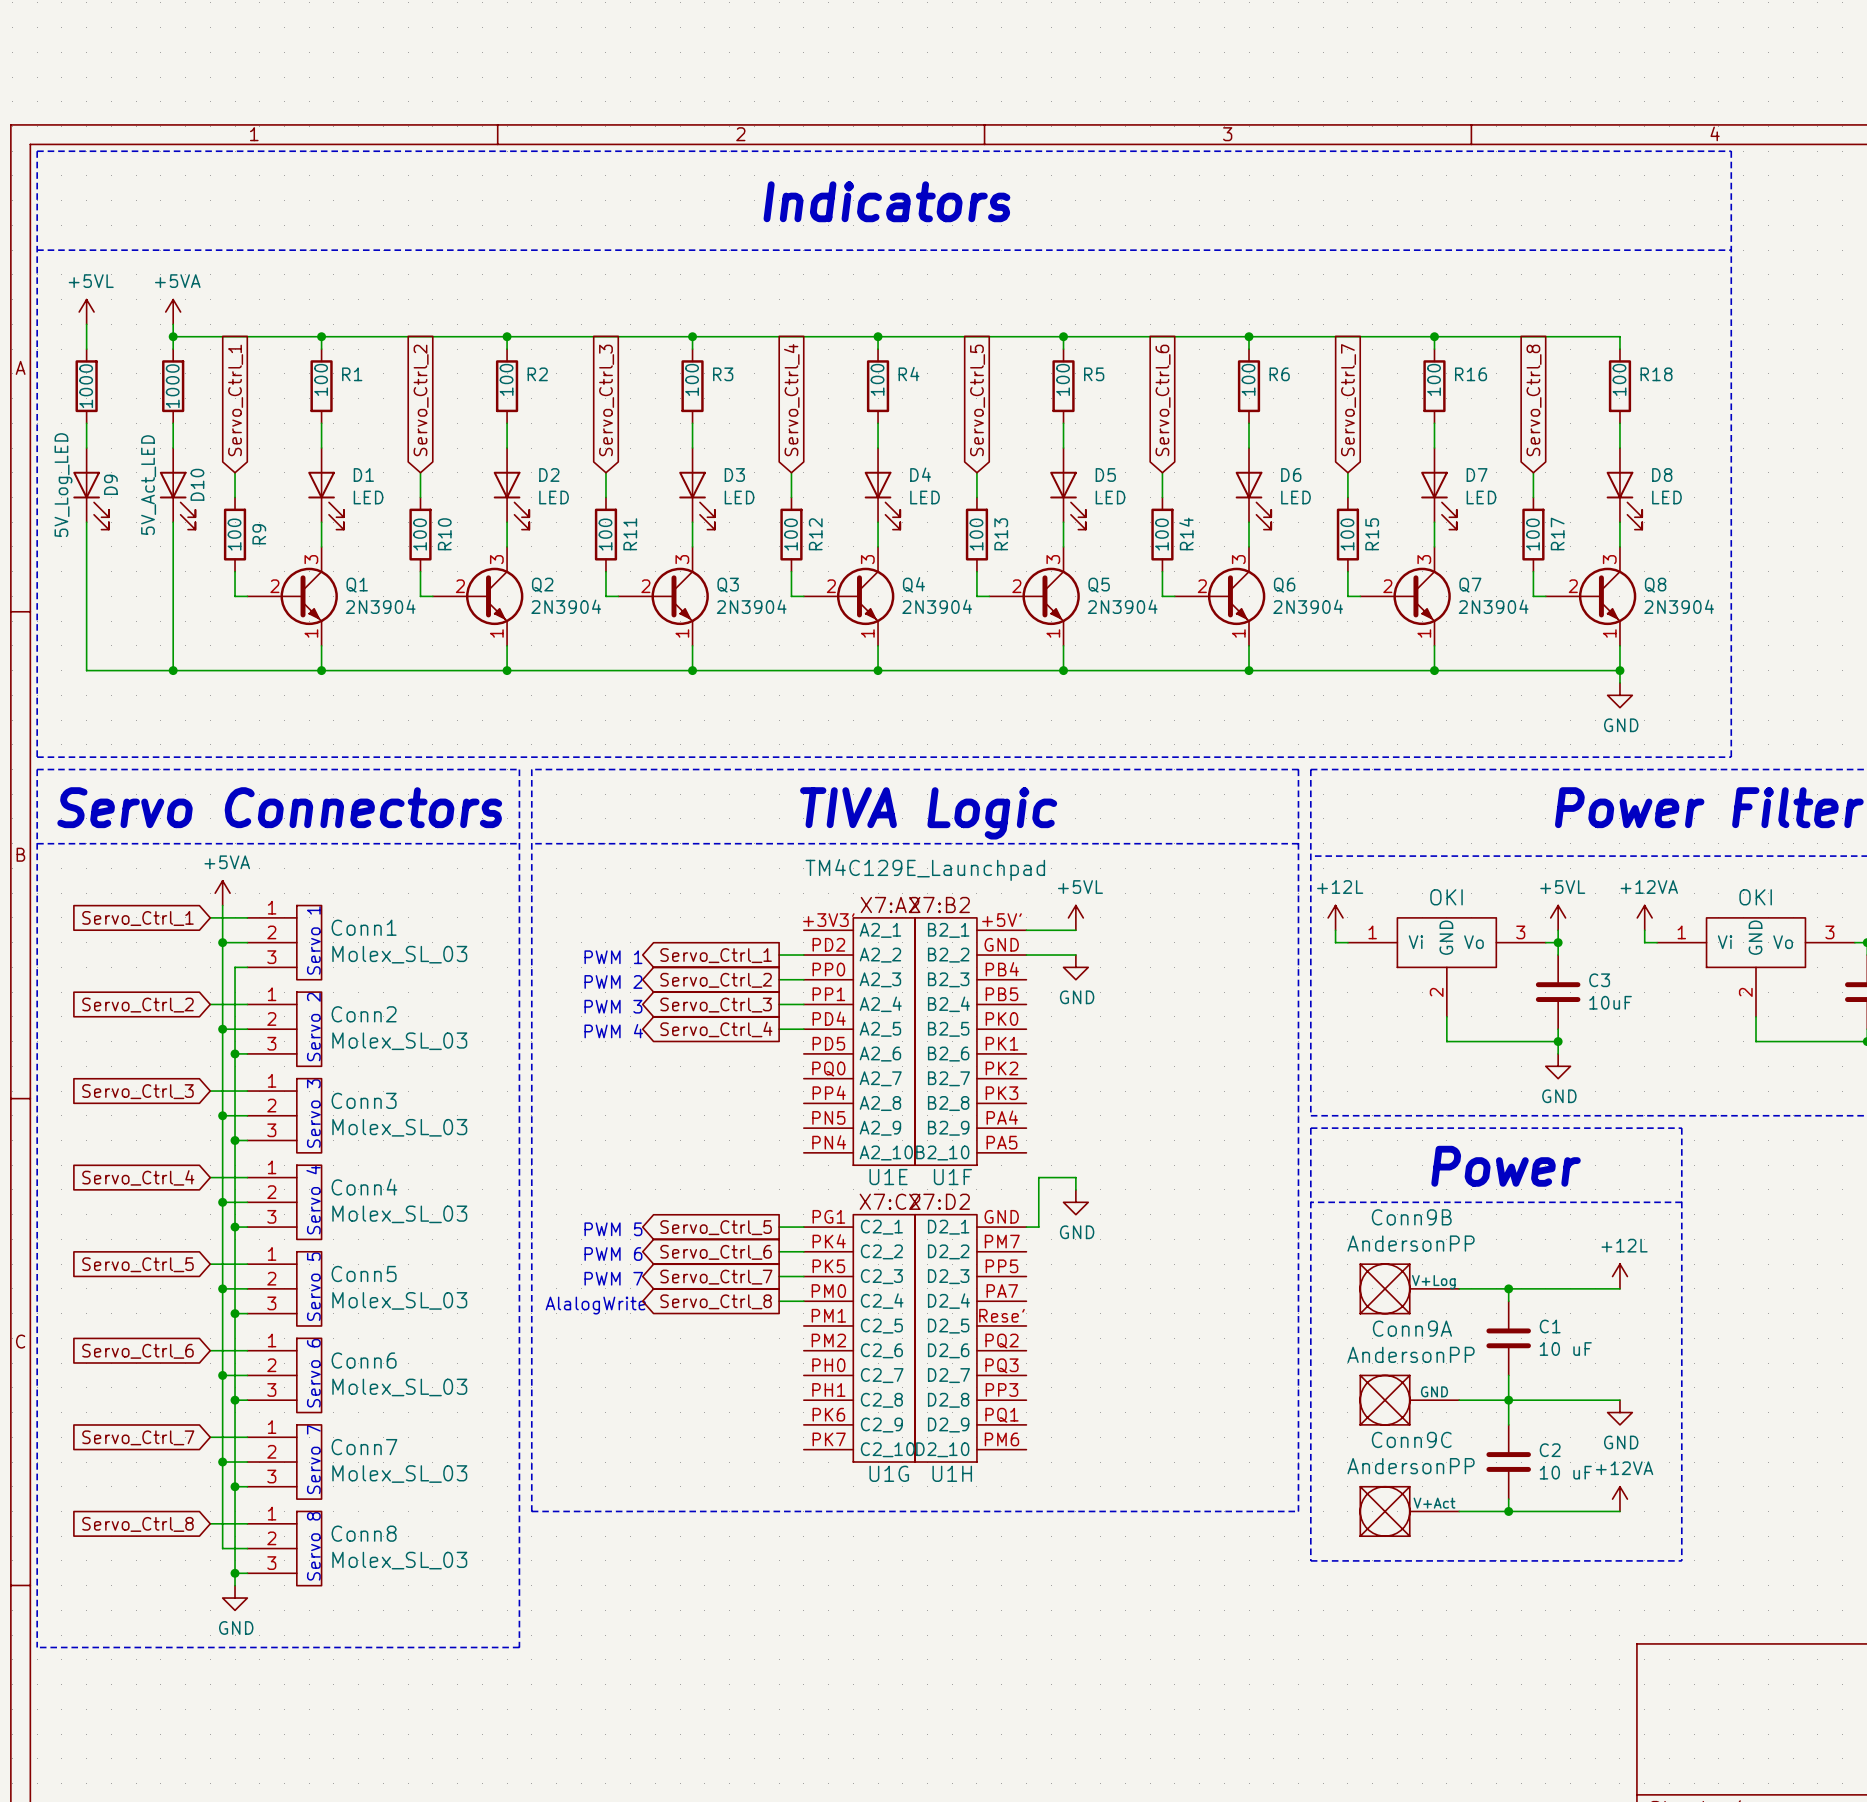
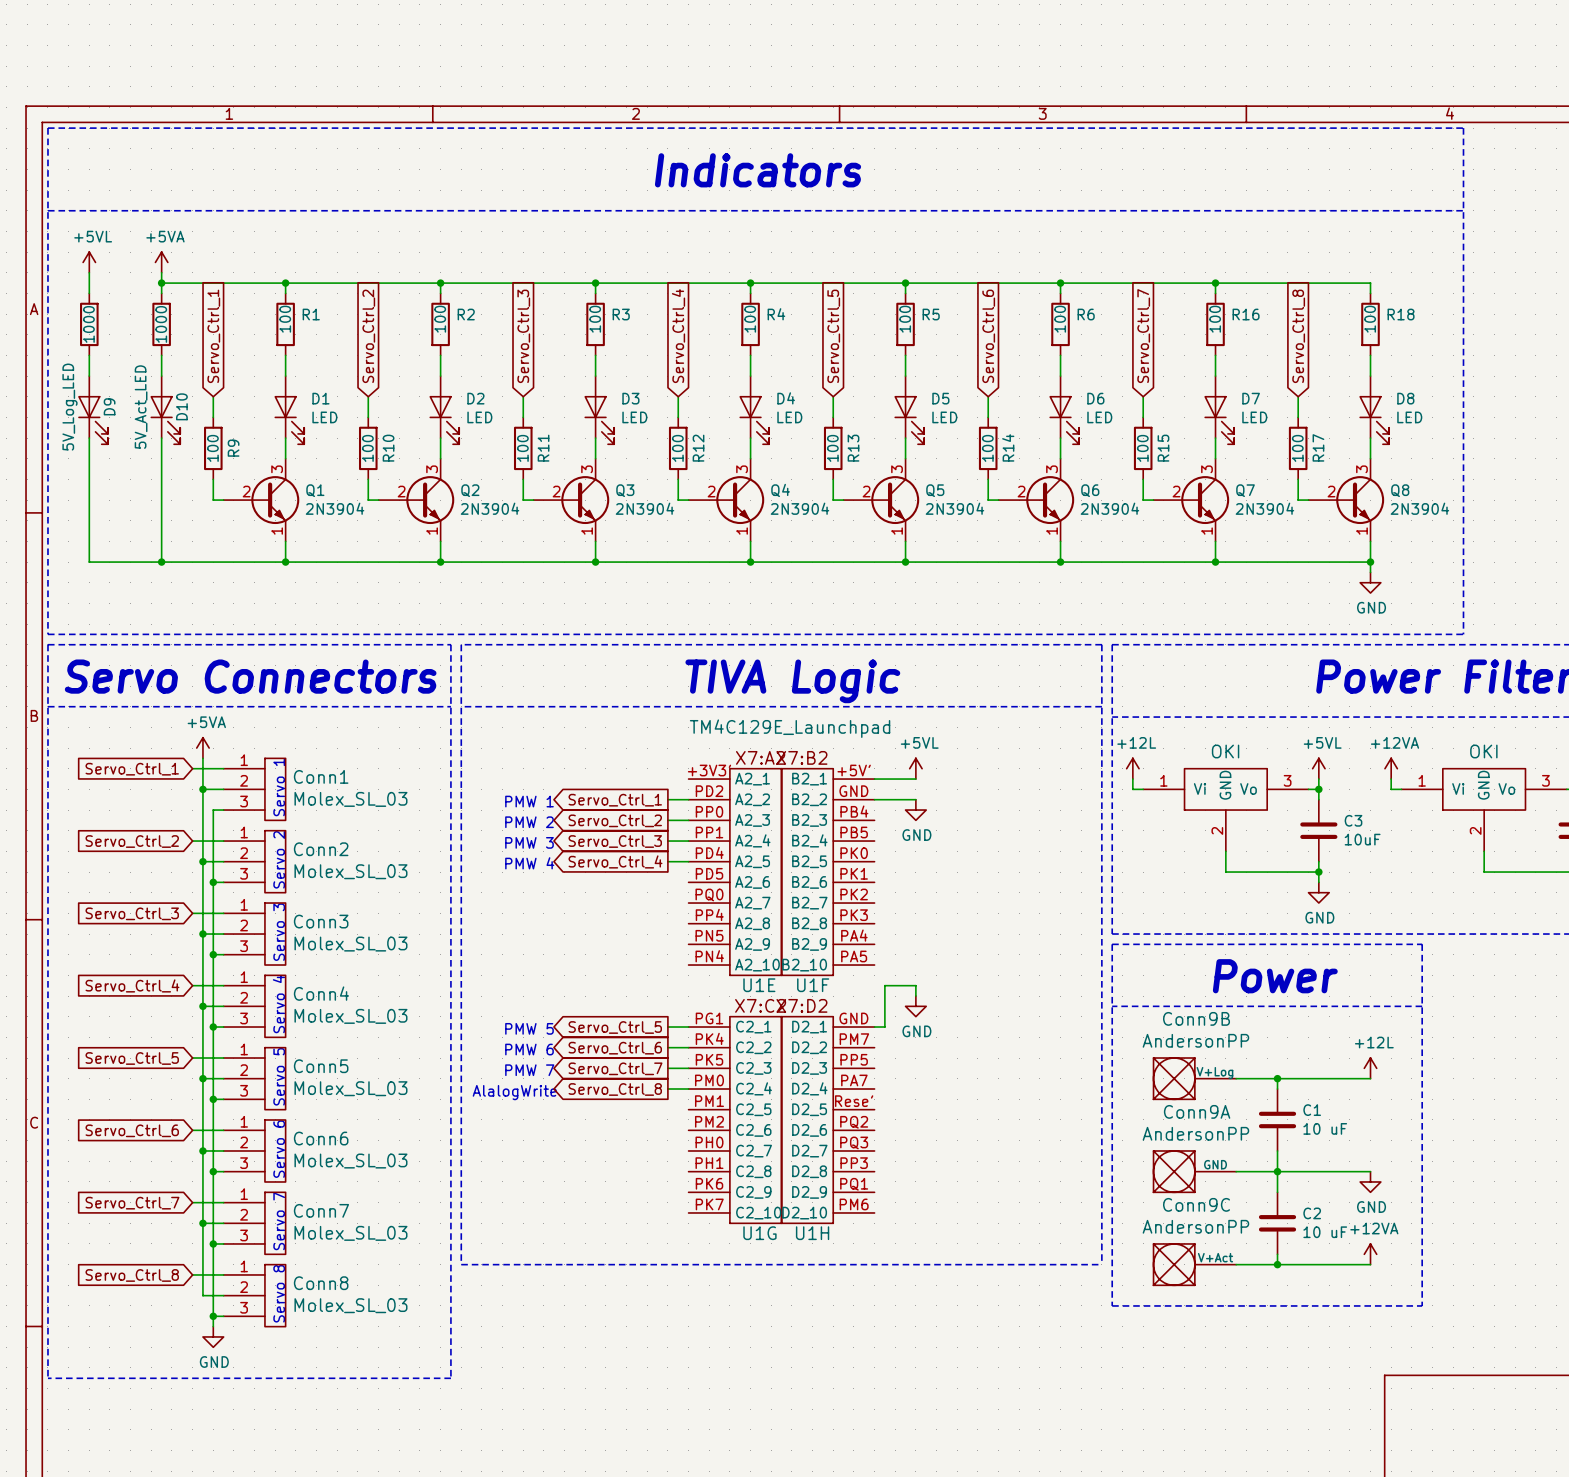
text: PWM 1 (613, 957) -> PMW 1 (529, 801)
text: PWM 2 (613, 981) -> PMW 2 (529, 822)
text: PWM 3 (613, 1006) -> PMW 3 (529, 842)
text: PWM 4 (613, 1031) -> PMW 4 (529, 863)
text: PWM 5 (613, 1229) -> PMW 5 (529, 1028)
text: PWM 6 (613, 1254) -> PMW 6 (529, 1049)
text: PWM 7 (613, 1278) -> PMW 7 (529, 1070)

